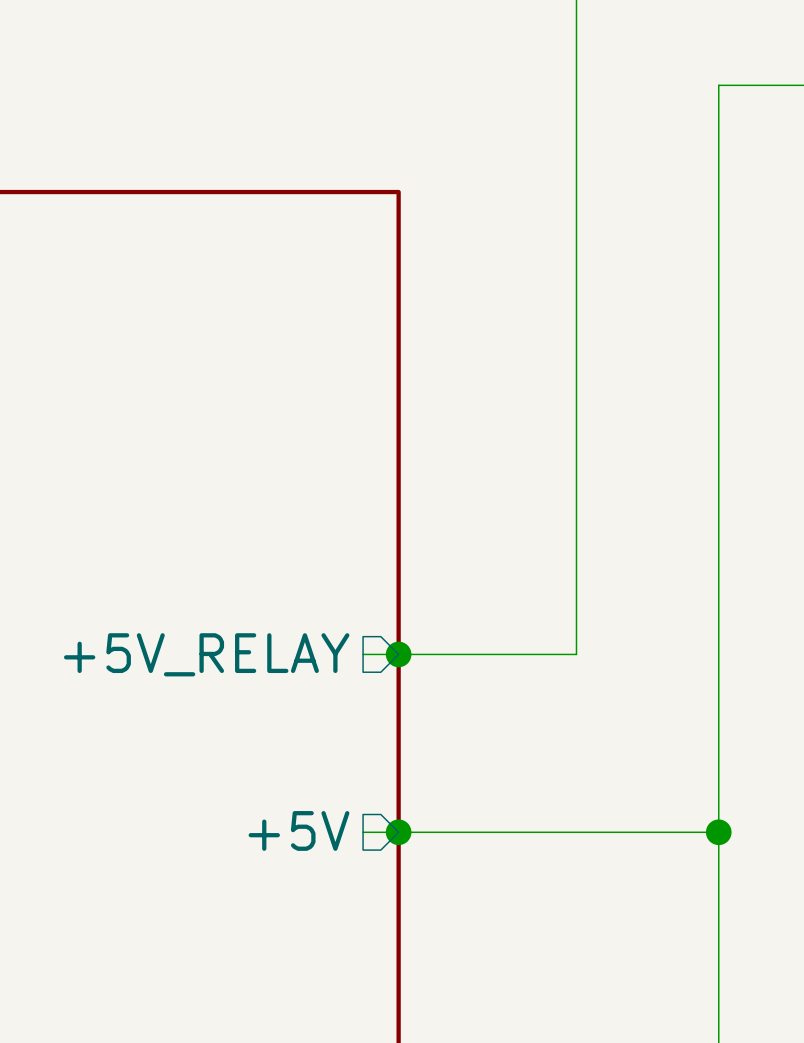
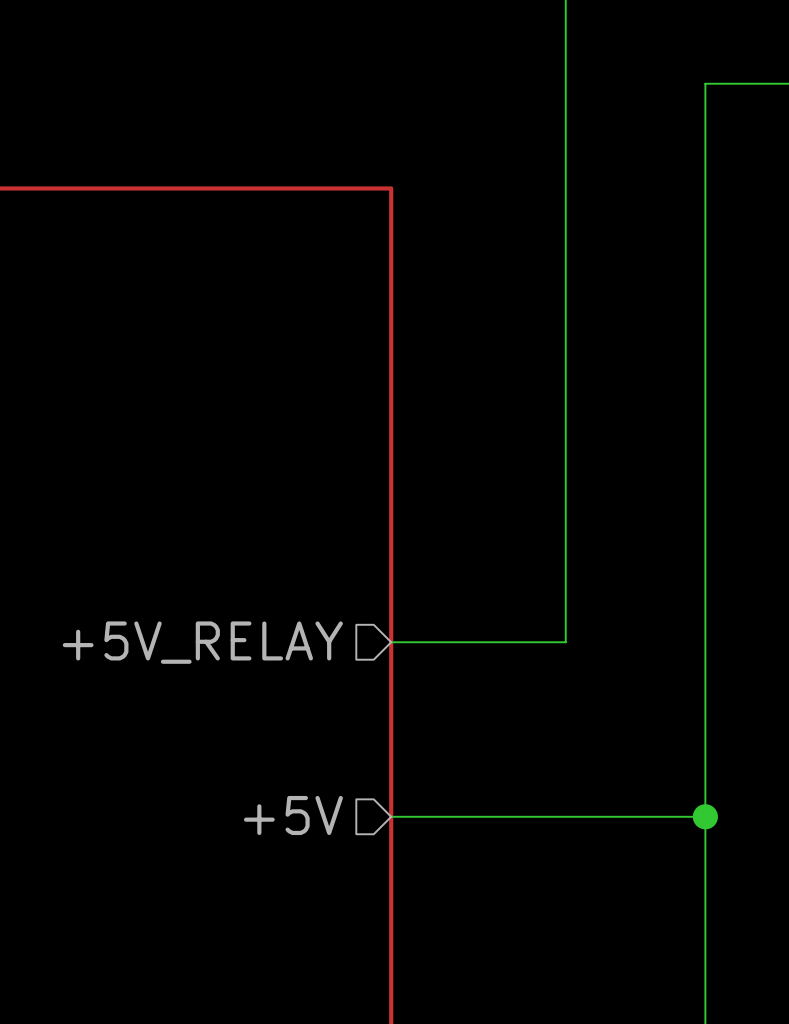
wire: (363, 654) (398, 654) -> none
junction: (398, 654) -> none
wire: (363, 832) (398, 832) -> none
junction: (398, 832) -> none

